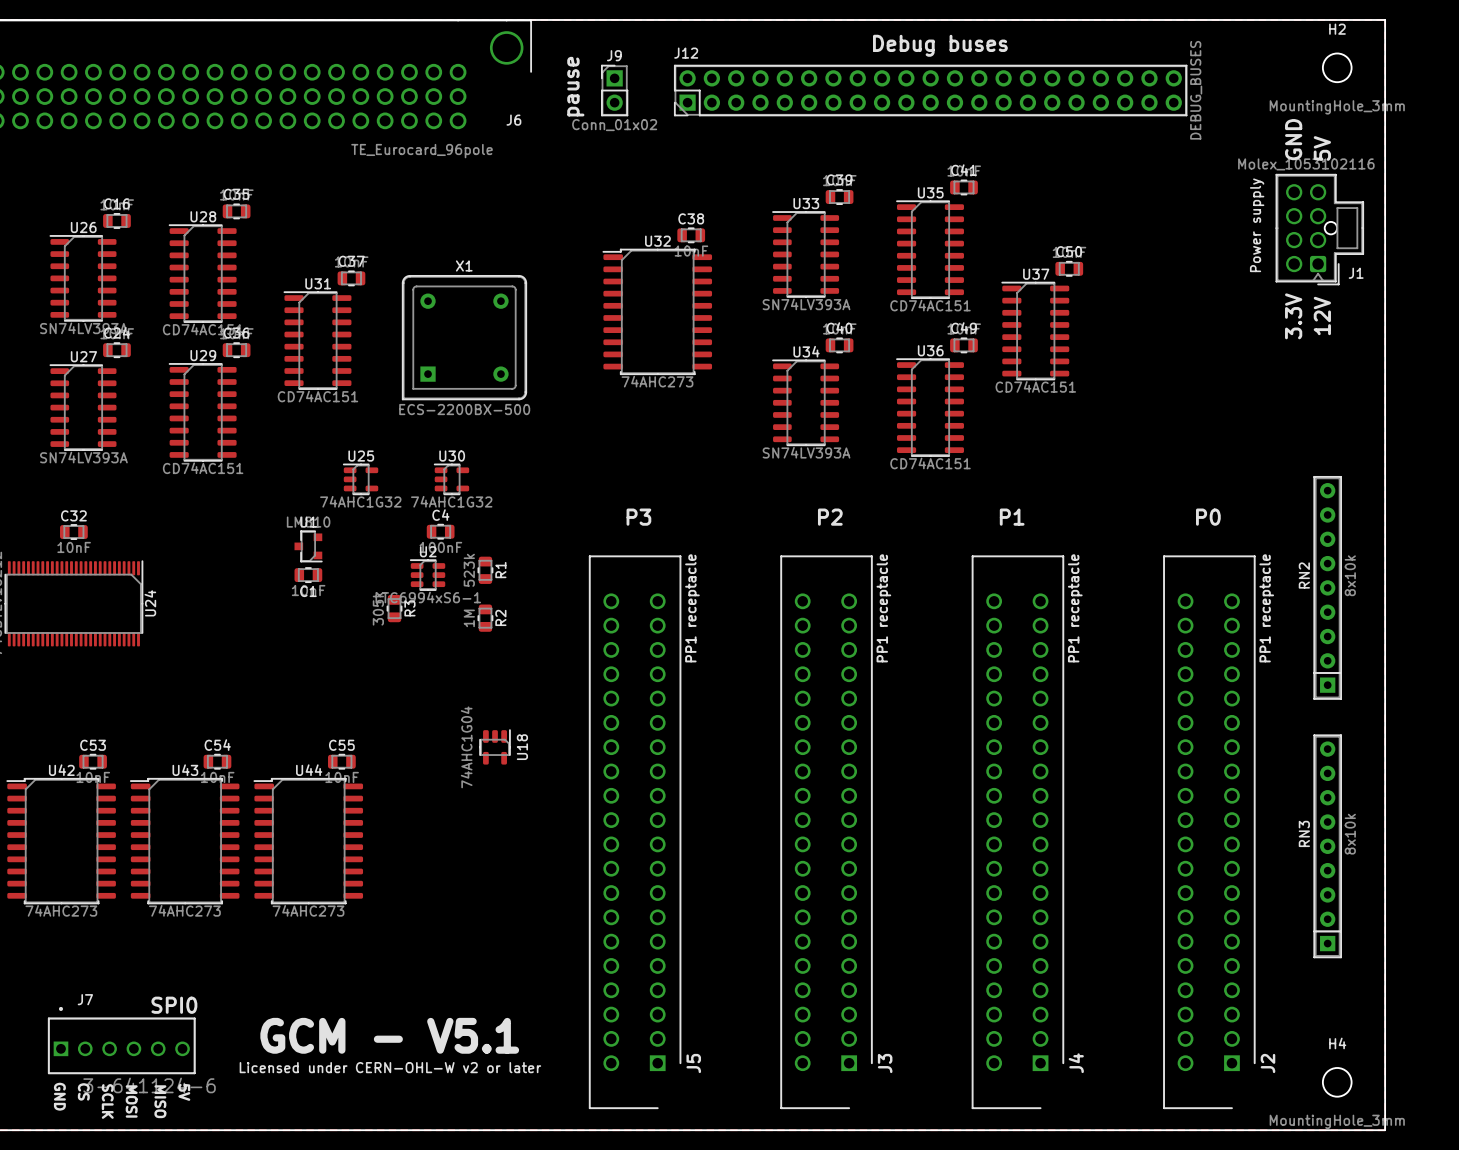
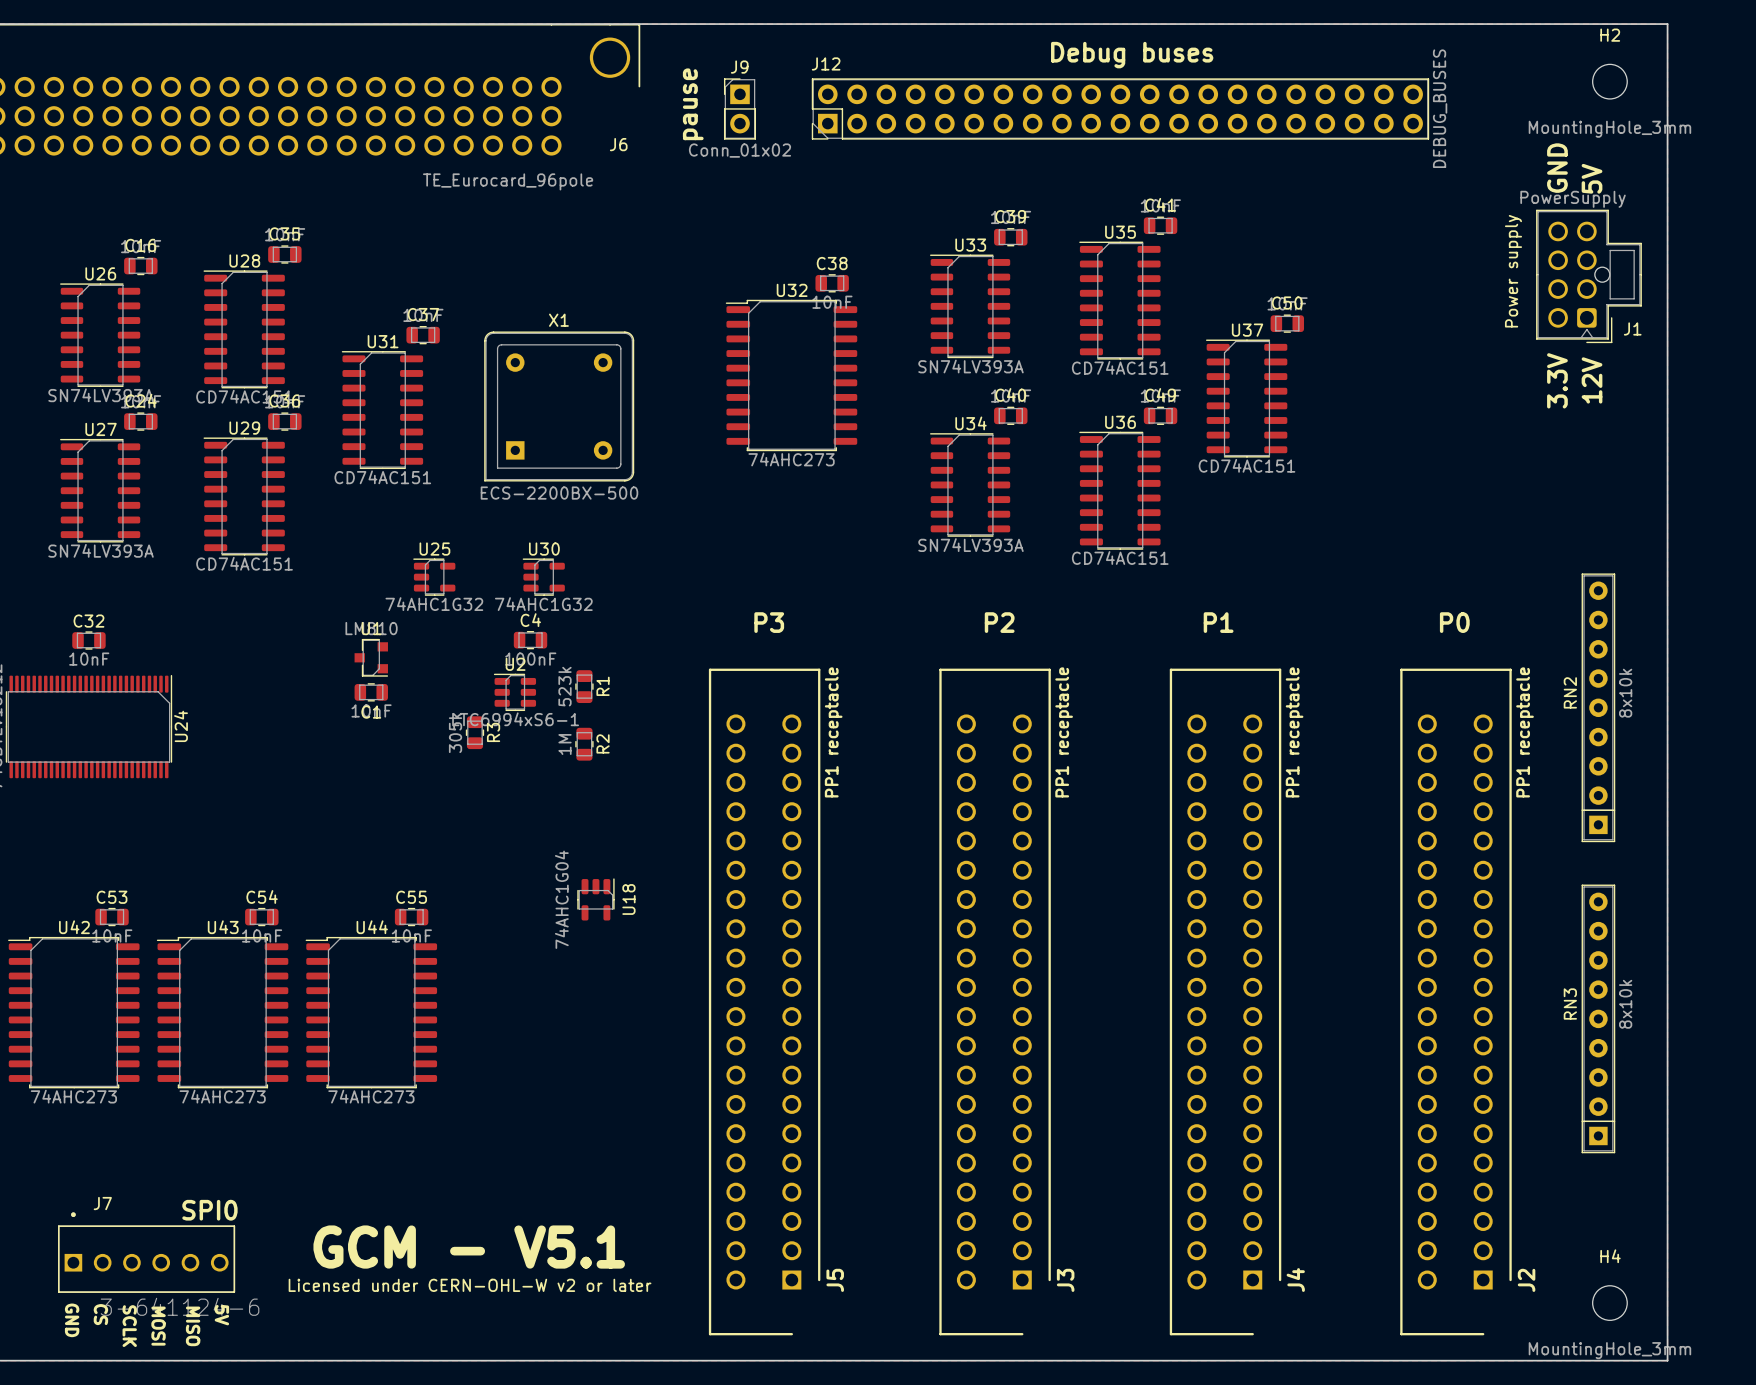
J1 value: Molex_1053102116 (1306, 164) -> PowerSupply (1573, 199)

